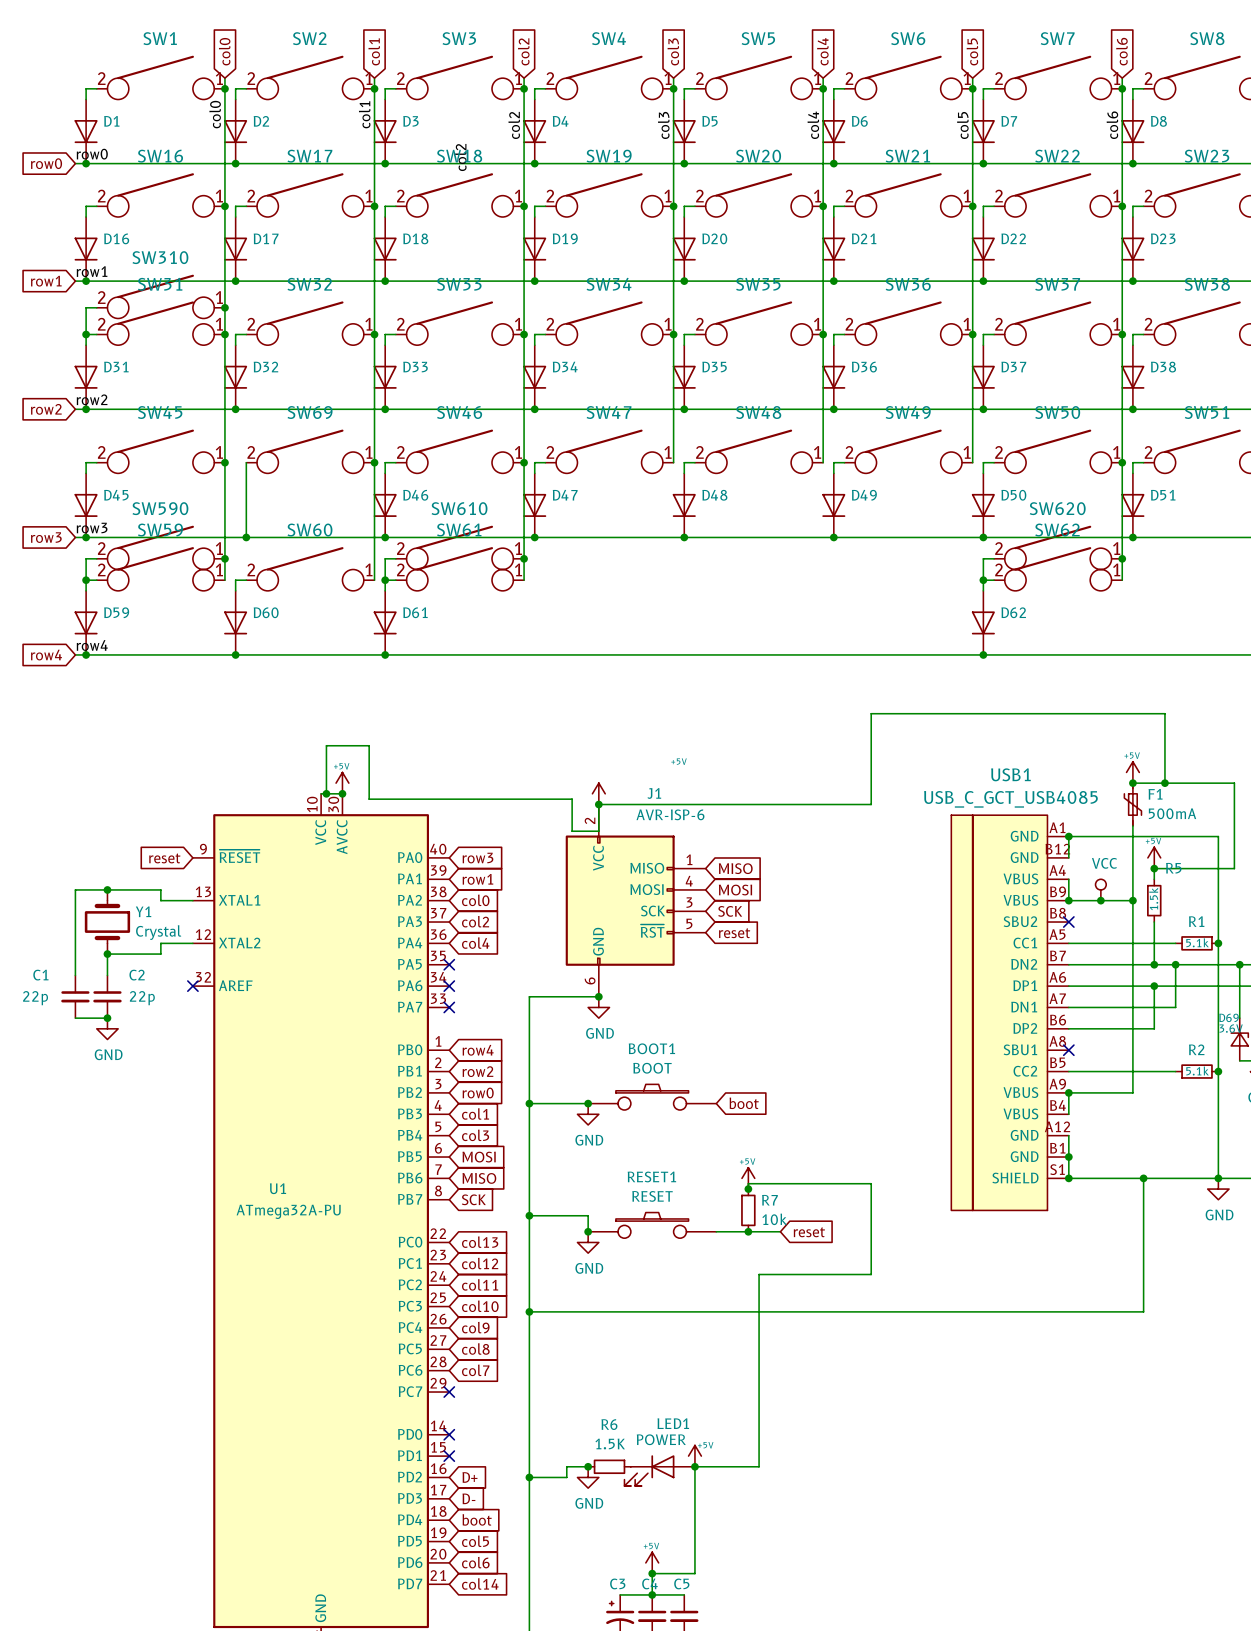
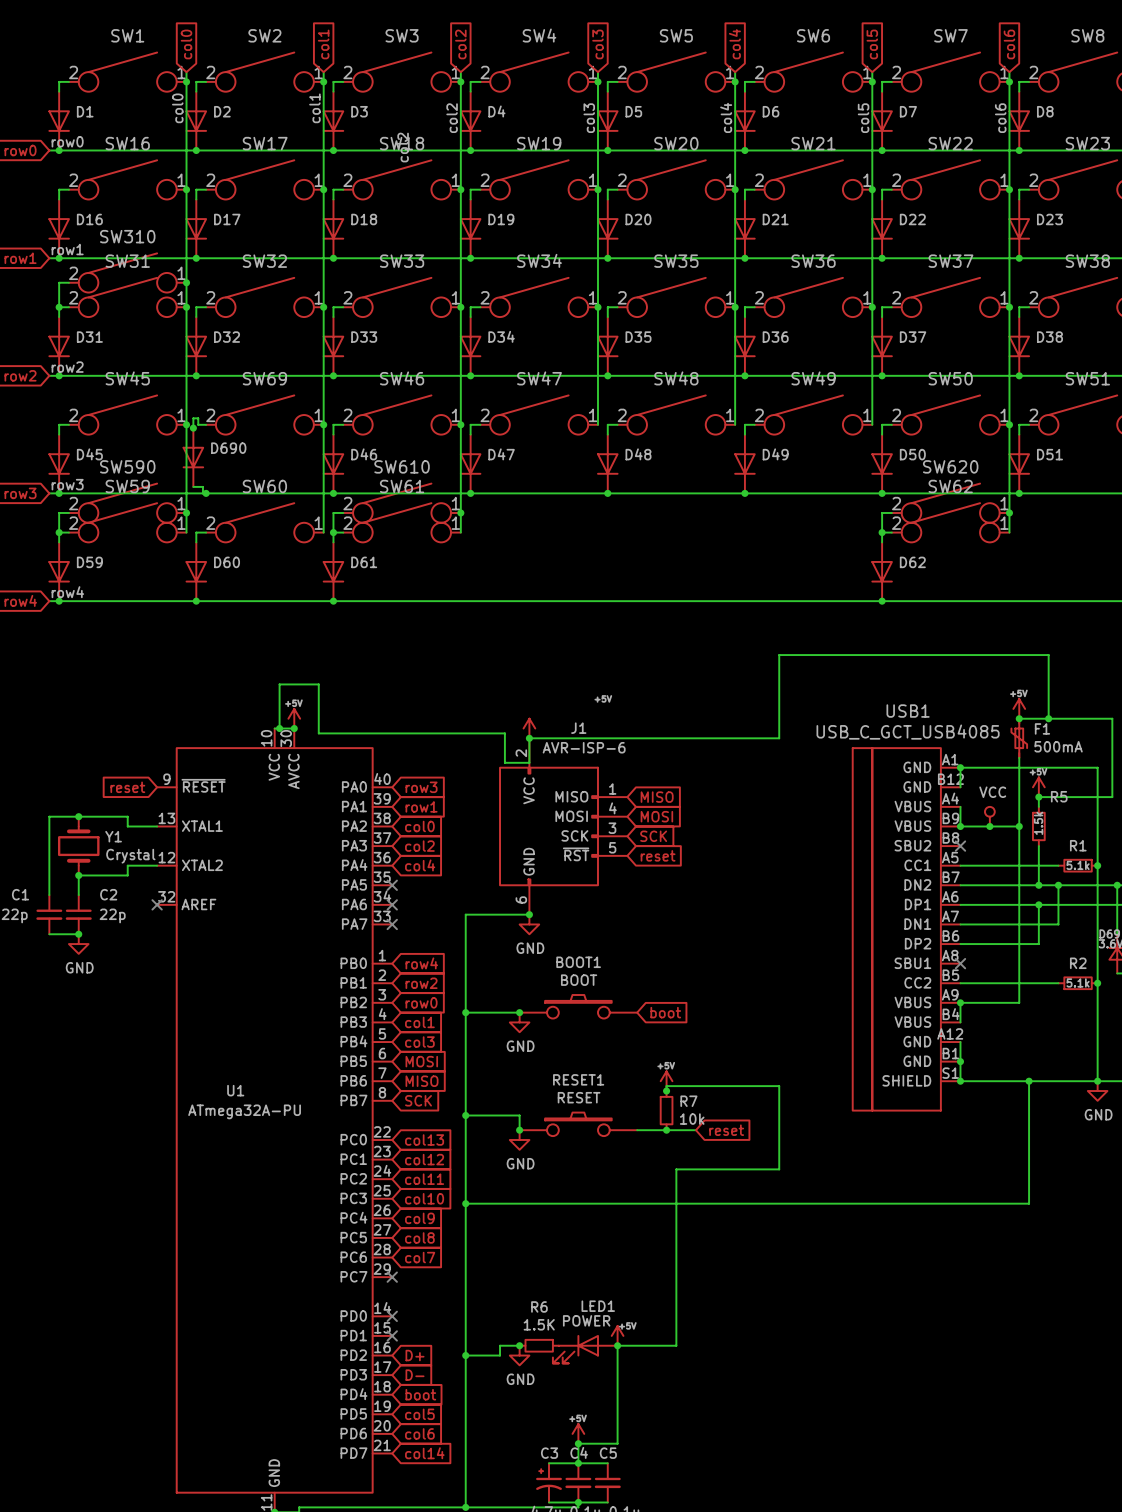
wire: (246, 462) (246, 537) -> (206, 424) (198, 424) (198, 418) (193, 418) (193, 428)
junction: none -> (193, 428)
D690: none -> (193, 457)
wire: none -> (193, 486) (202, 486) (202, 493)

